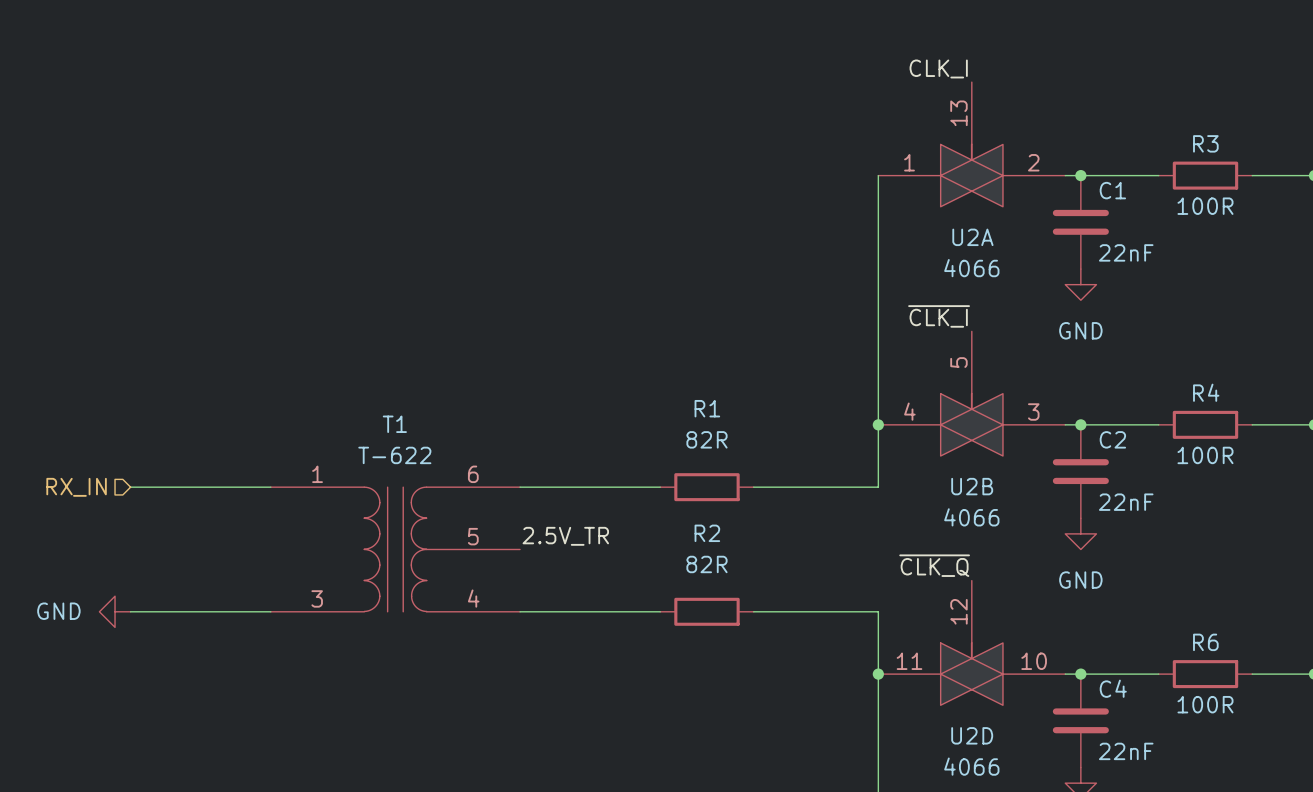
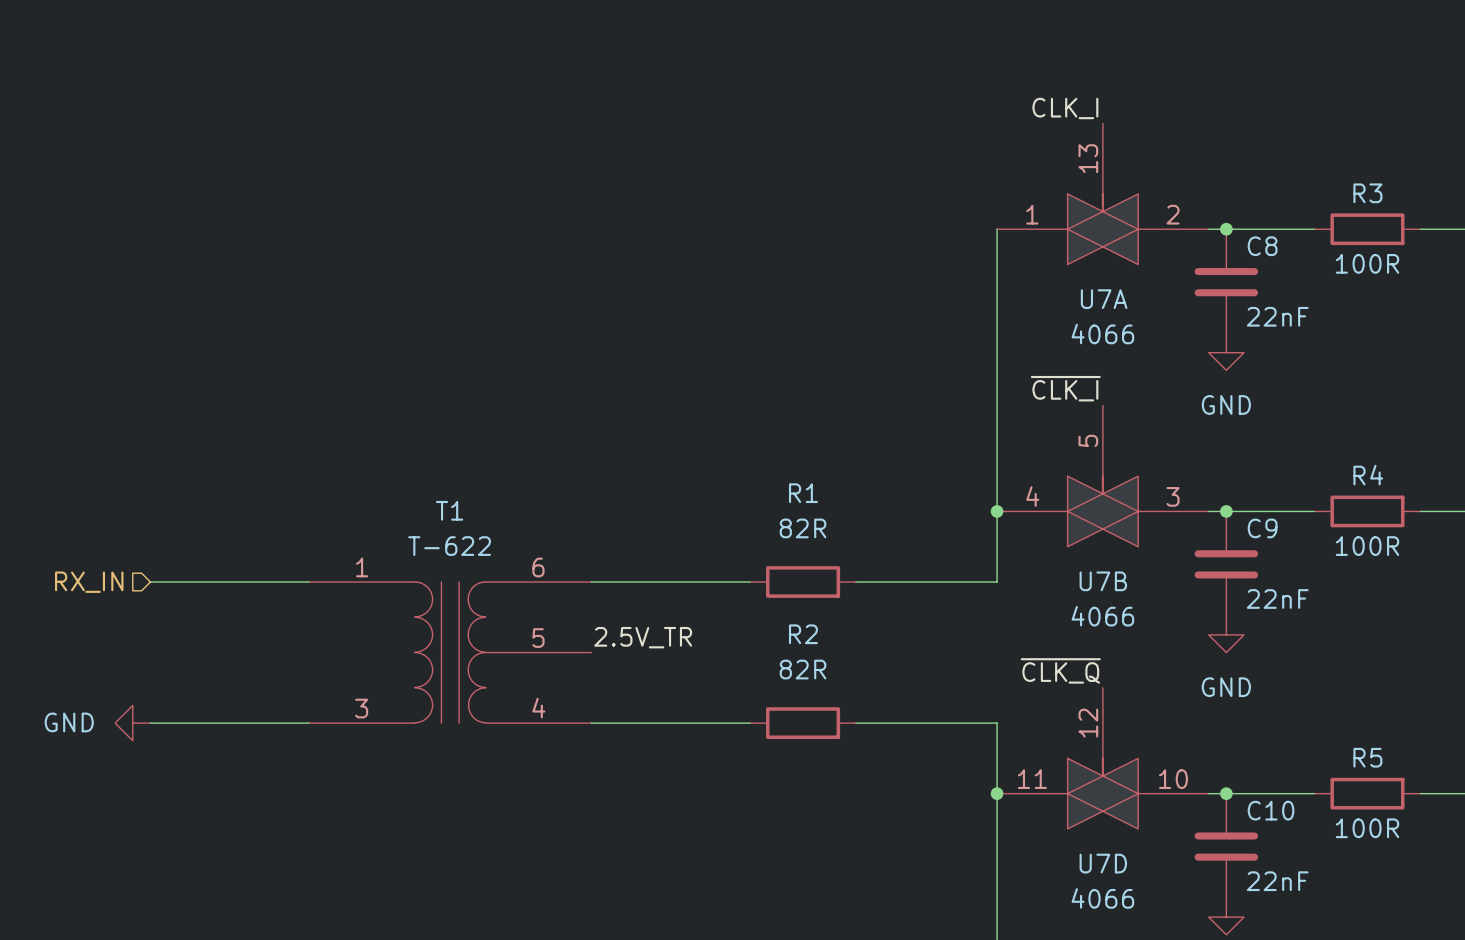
C1 name: C1 (1112, 190) -> C8 (1262, 246)
U2A name: U2A (972, 237) -> U7A (1104, 299)
C2 name: C2 (1112, 439) -> C9 (1262, 528)
U2B name: U2B (972, 486) -> U7B (1103, 581)
R6 name: R6 (1205, 642) -> R5 (1367, 757)
C4 name: C4 (1113, 688) -> C10 (1271, 810)
U2D name: U2D (972, 735) -> U7D (1103, 863)

